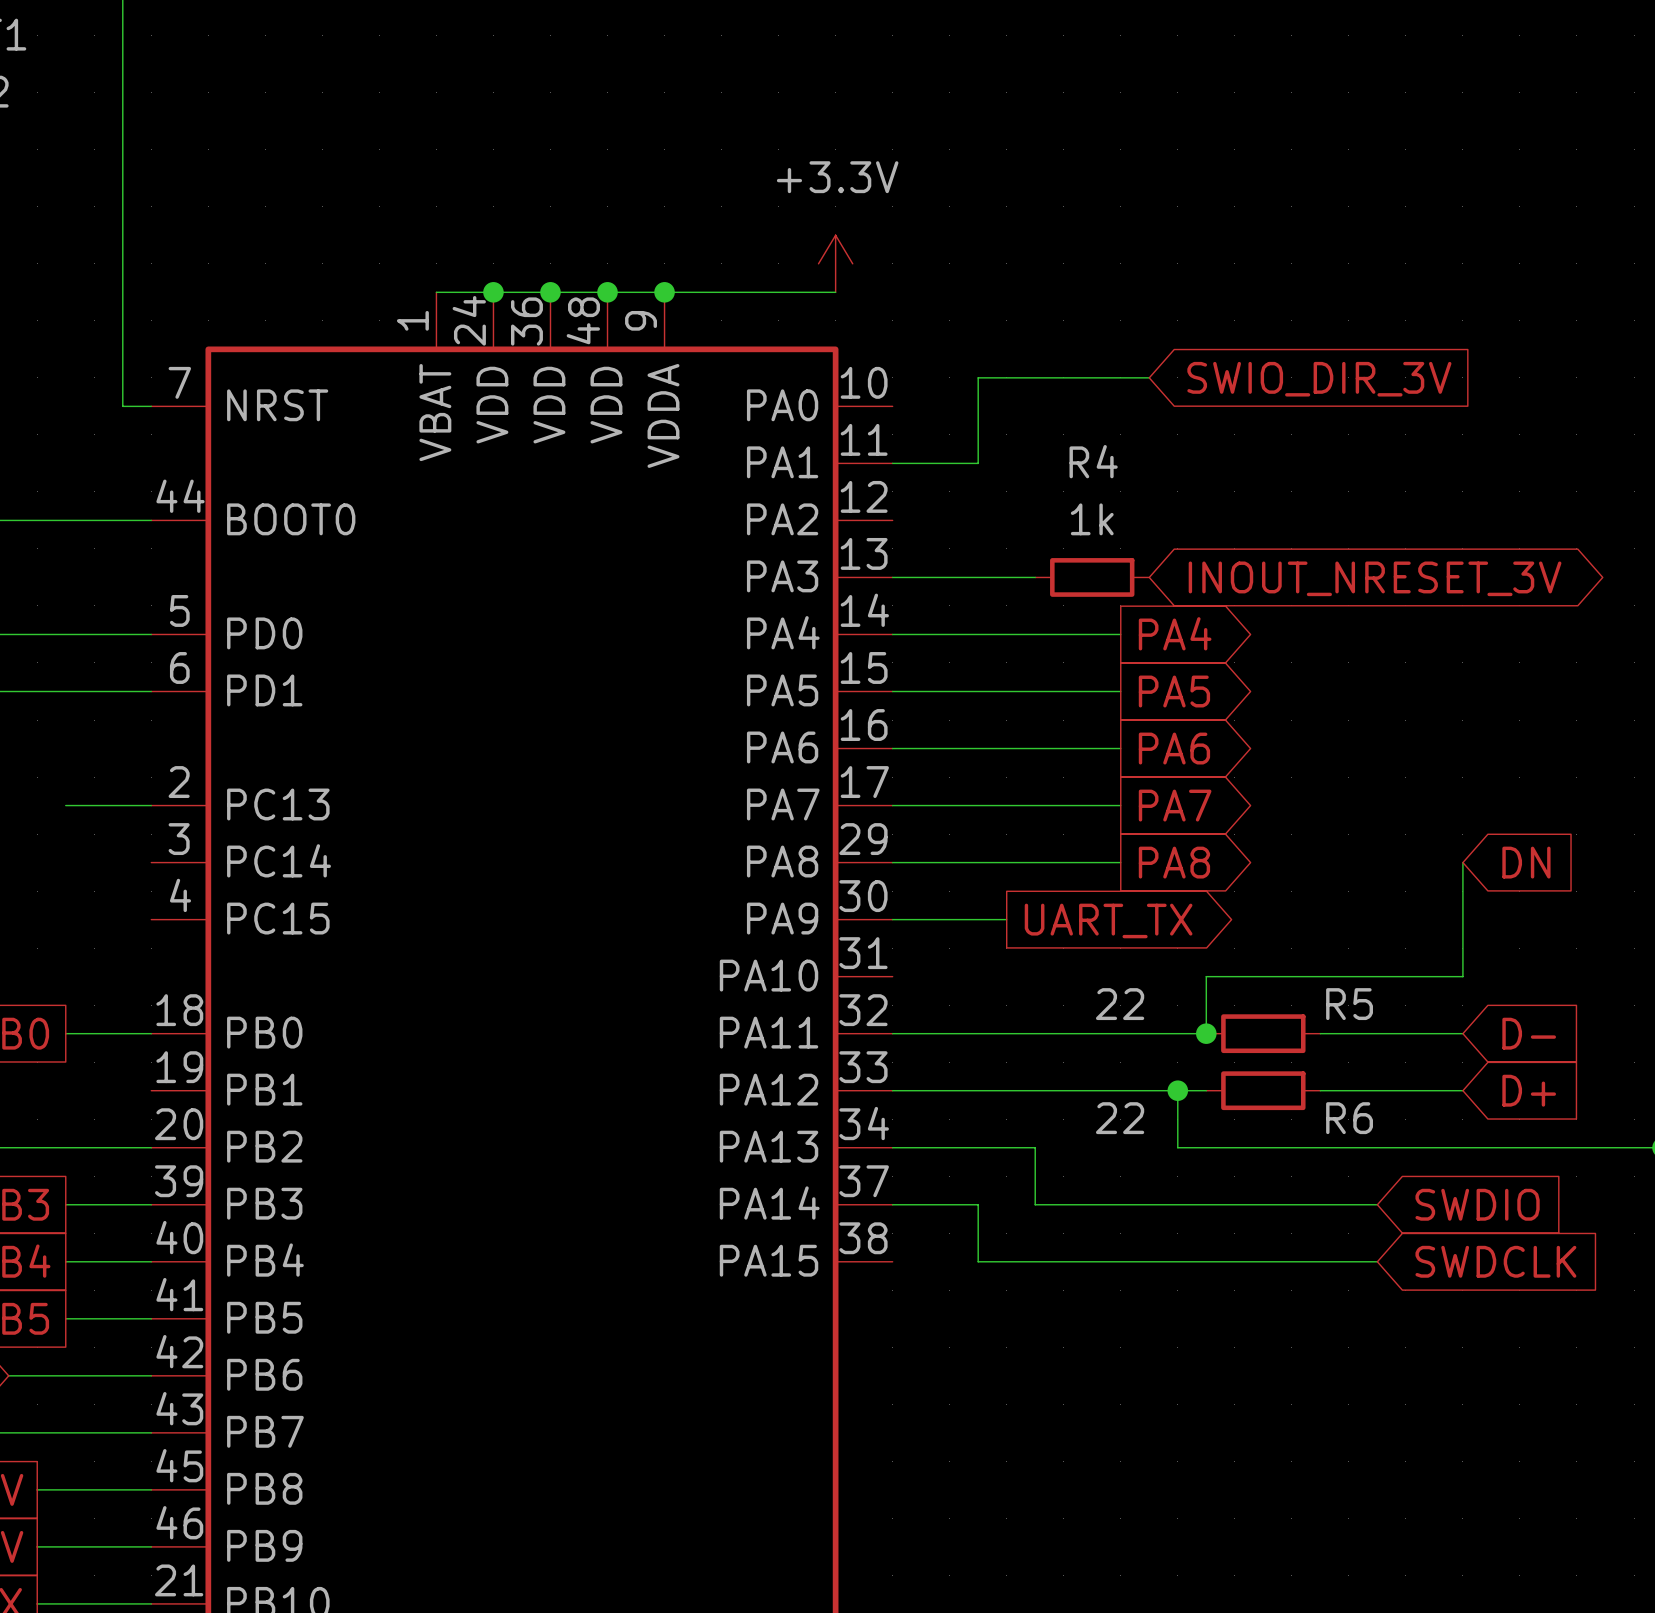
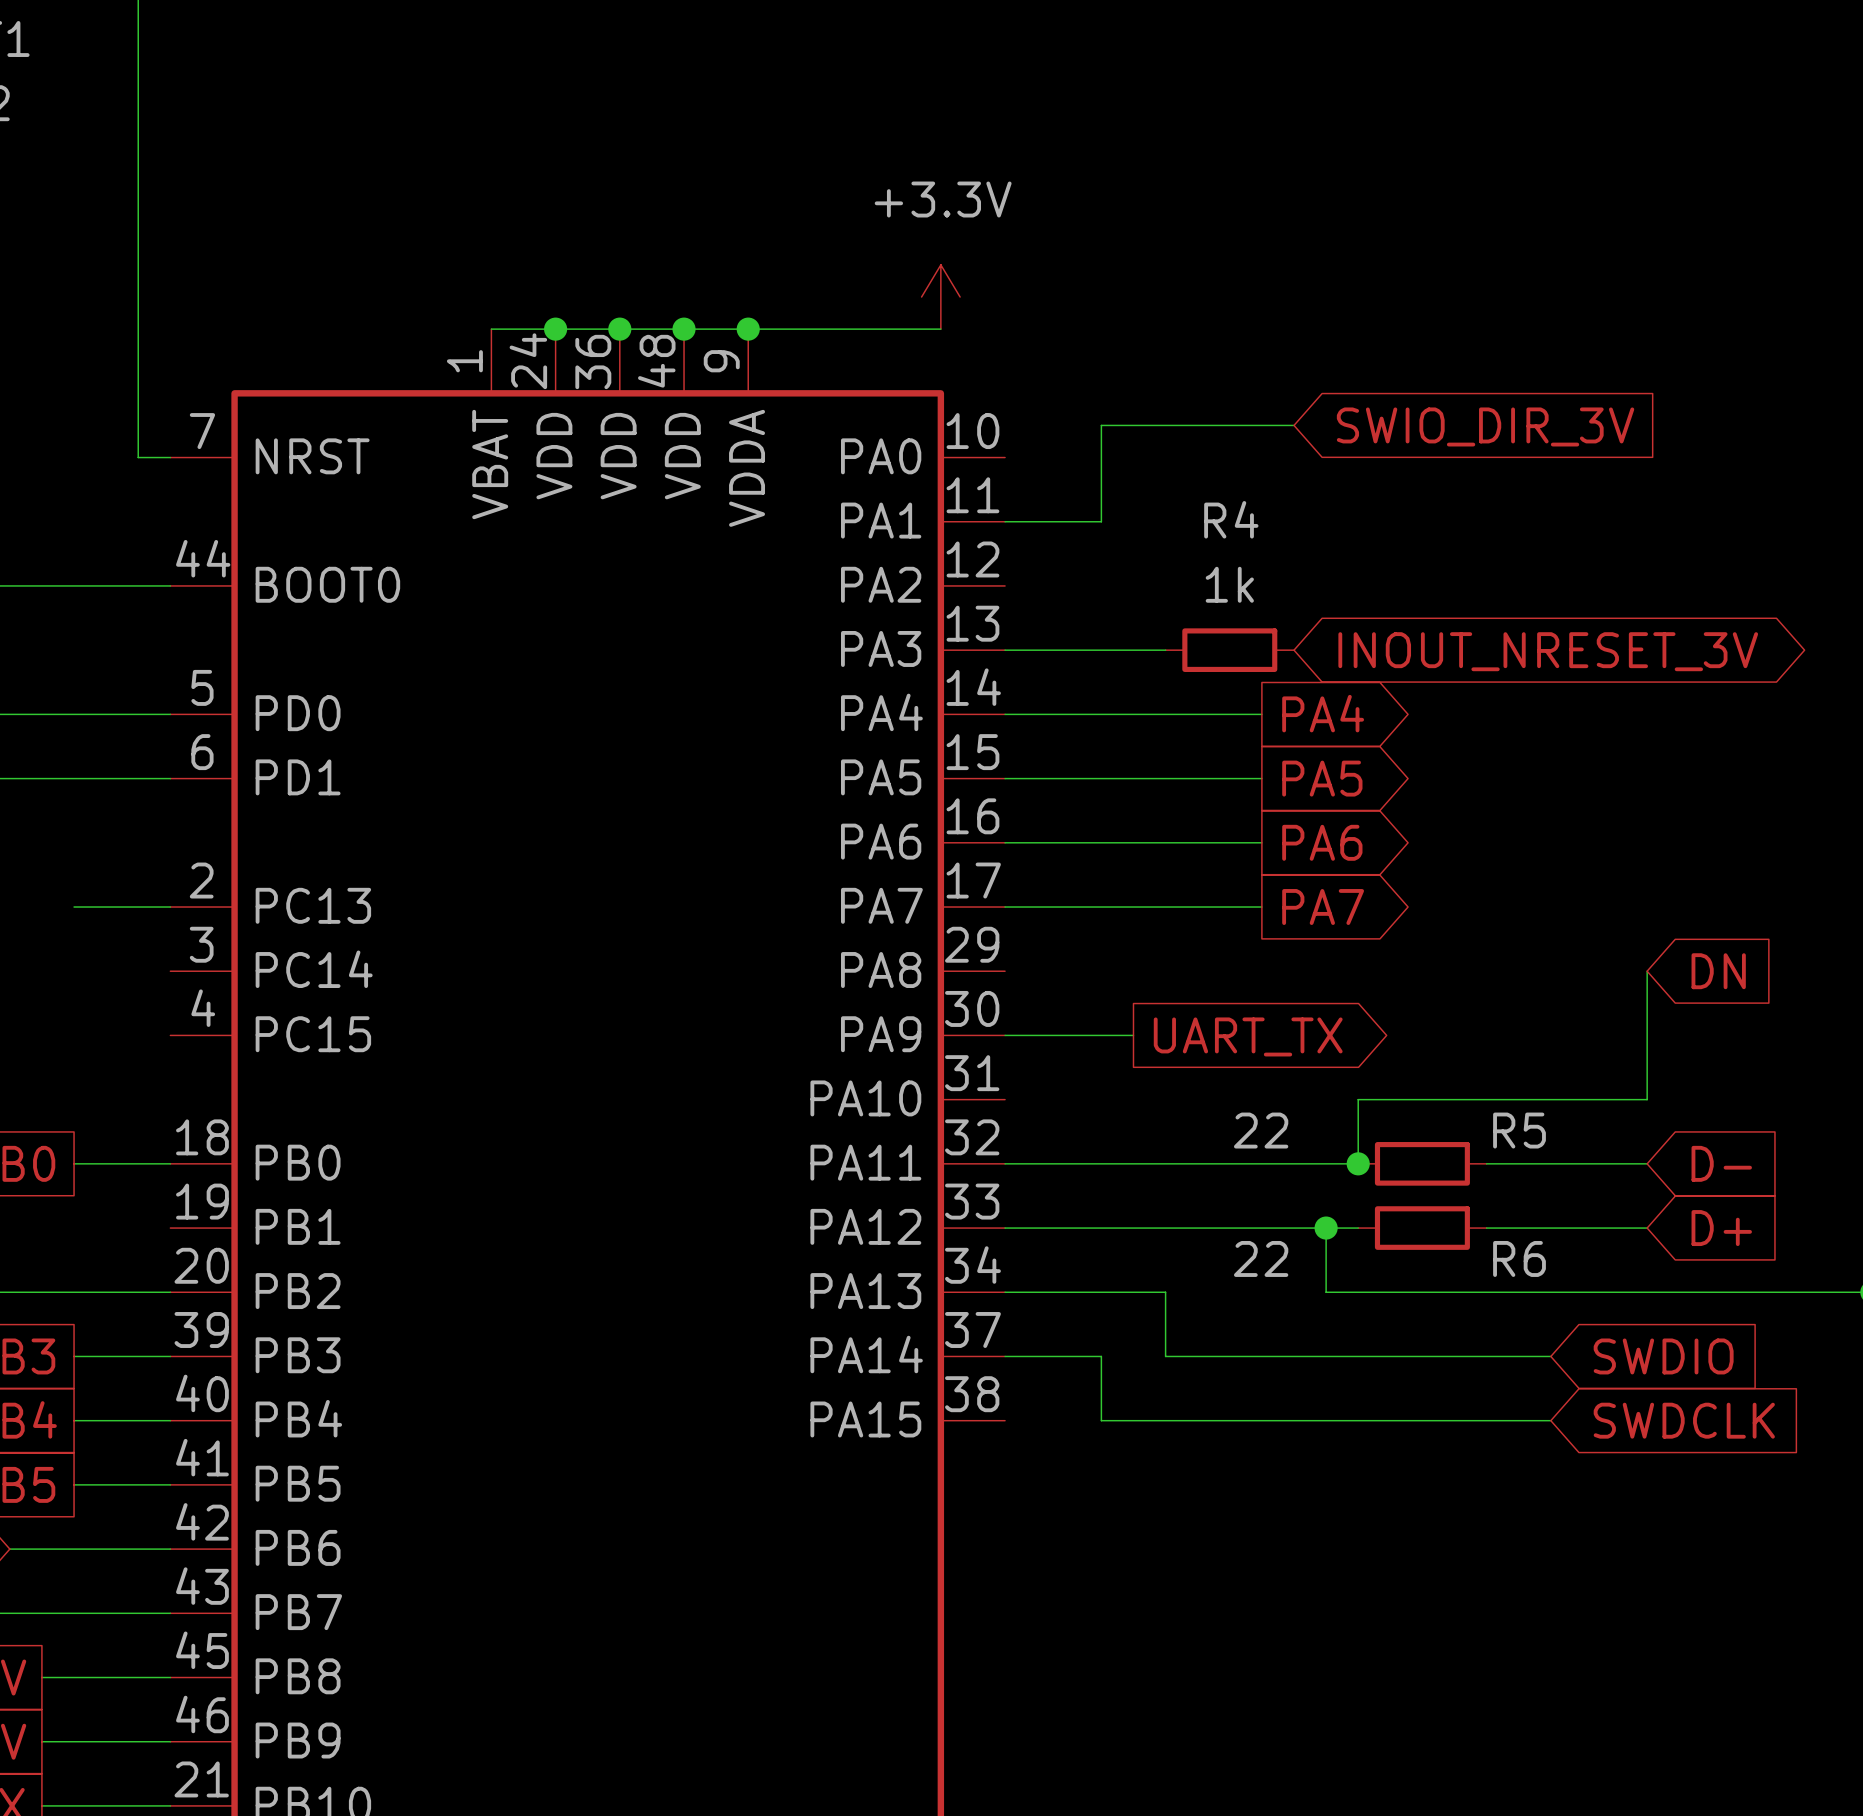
wire: (892, 862) (1120, 862) -> none
global label: PA8 (1174, 862) -> none

